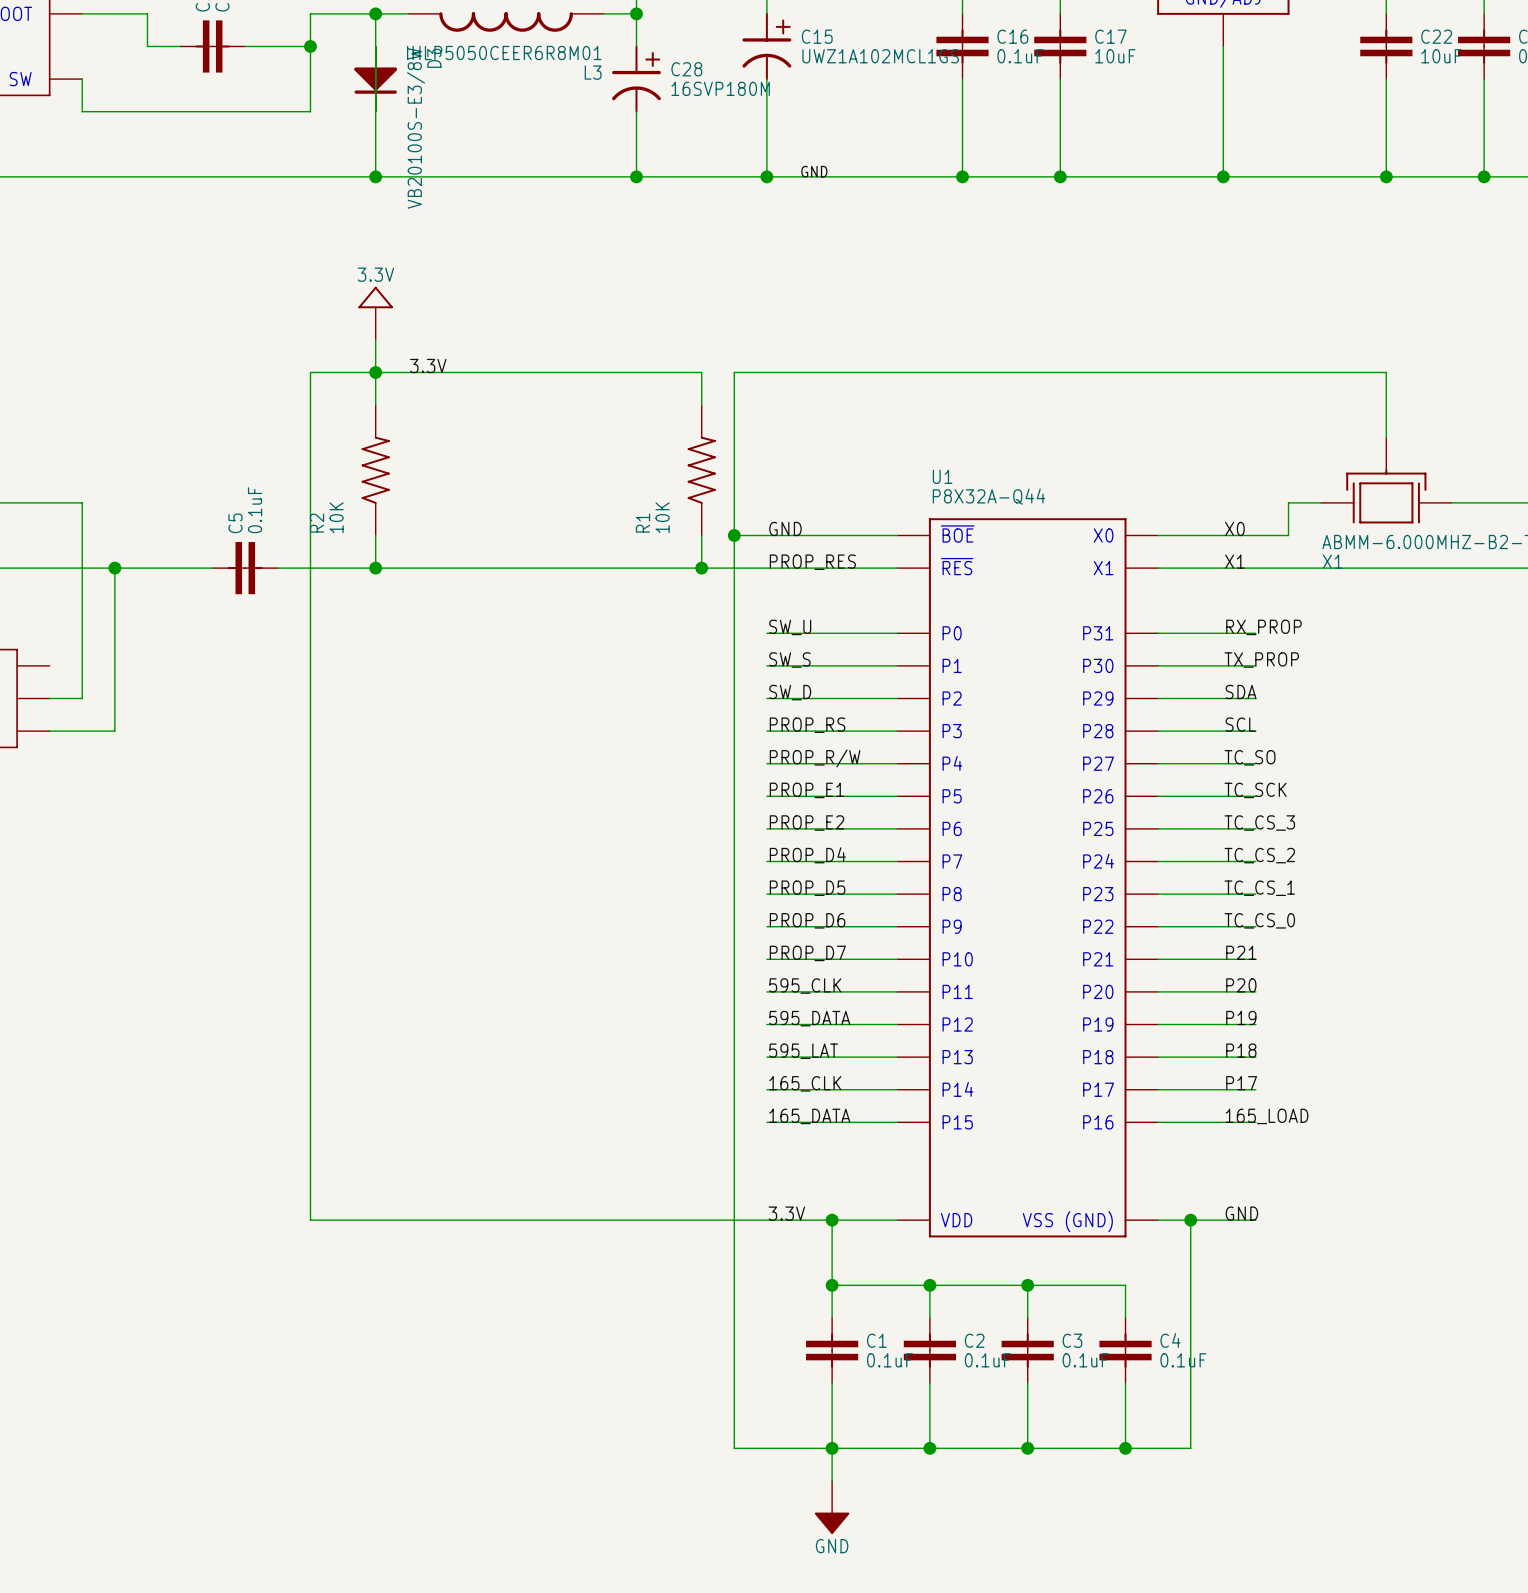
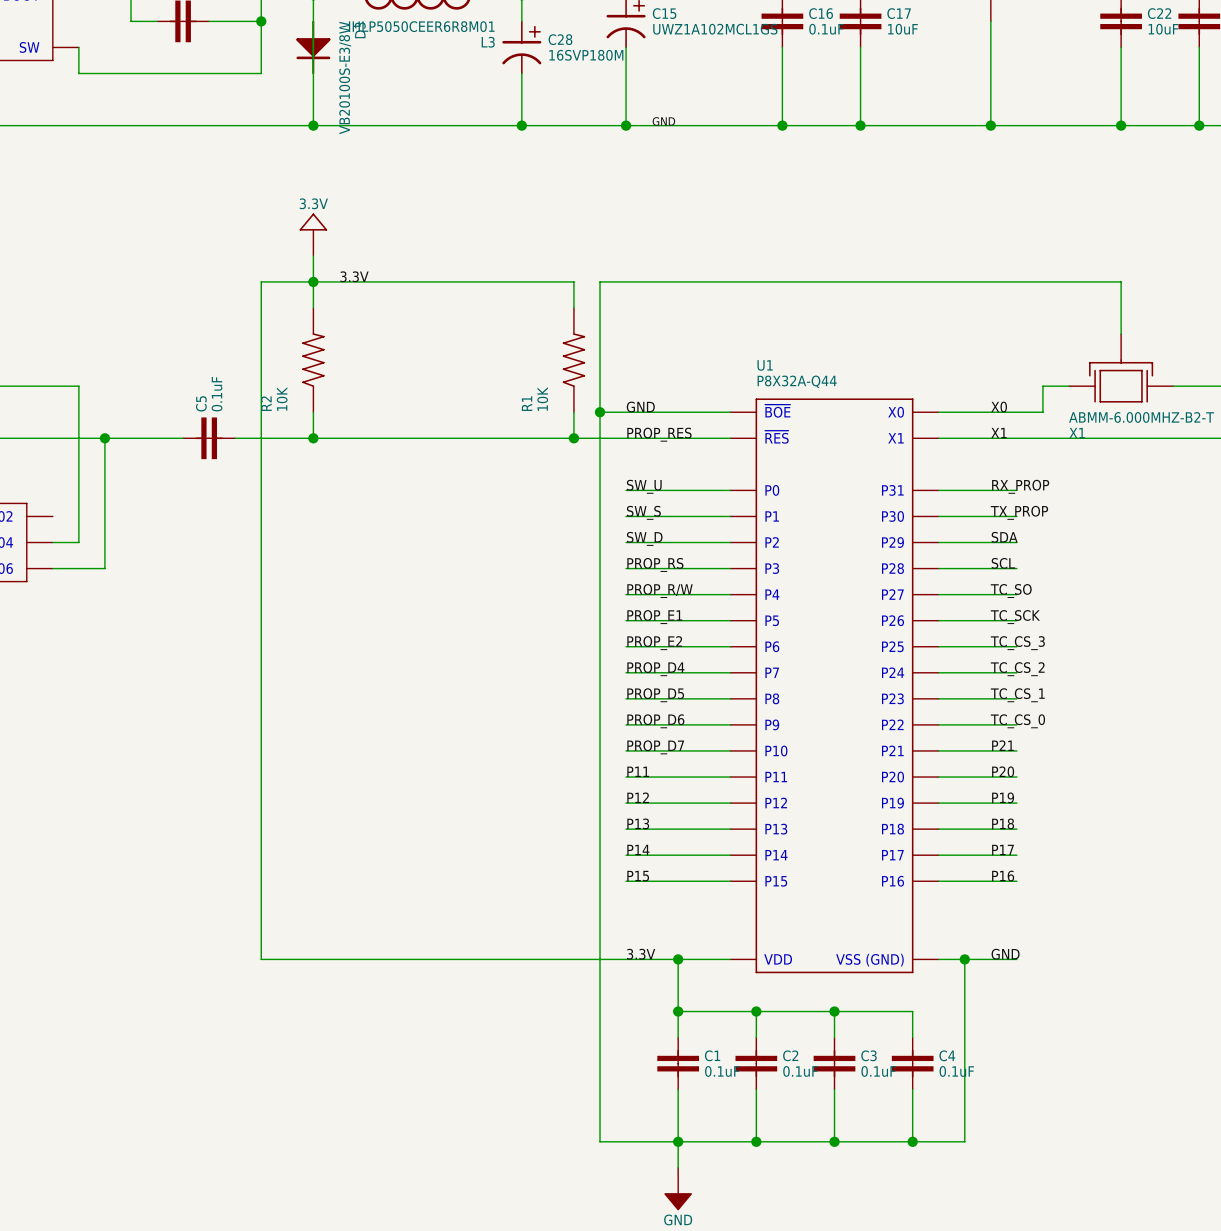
label: 595_CLK (805, 986) -> P11 (638, 771)
label: 595_DATA (809, 1018) -> P12 (638, 797)
label: 595_LAT (803, 1051) -> P13 (638, 823)
label: 165_CLK (805, 1083) -> P14 (638, 849)
label: 165_DATA (809, 1116) -> P15 (638, 876)
label: 165_LOAD (1267, 1116) -> P16 (1003, 876)

